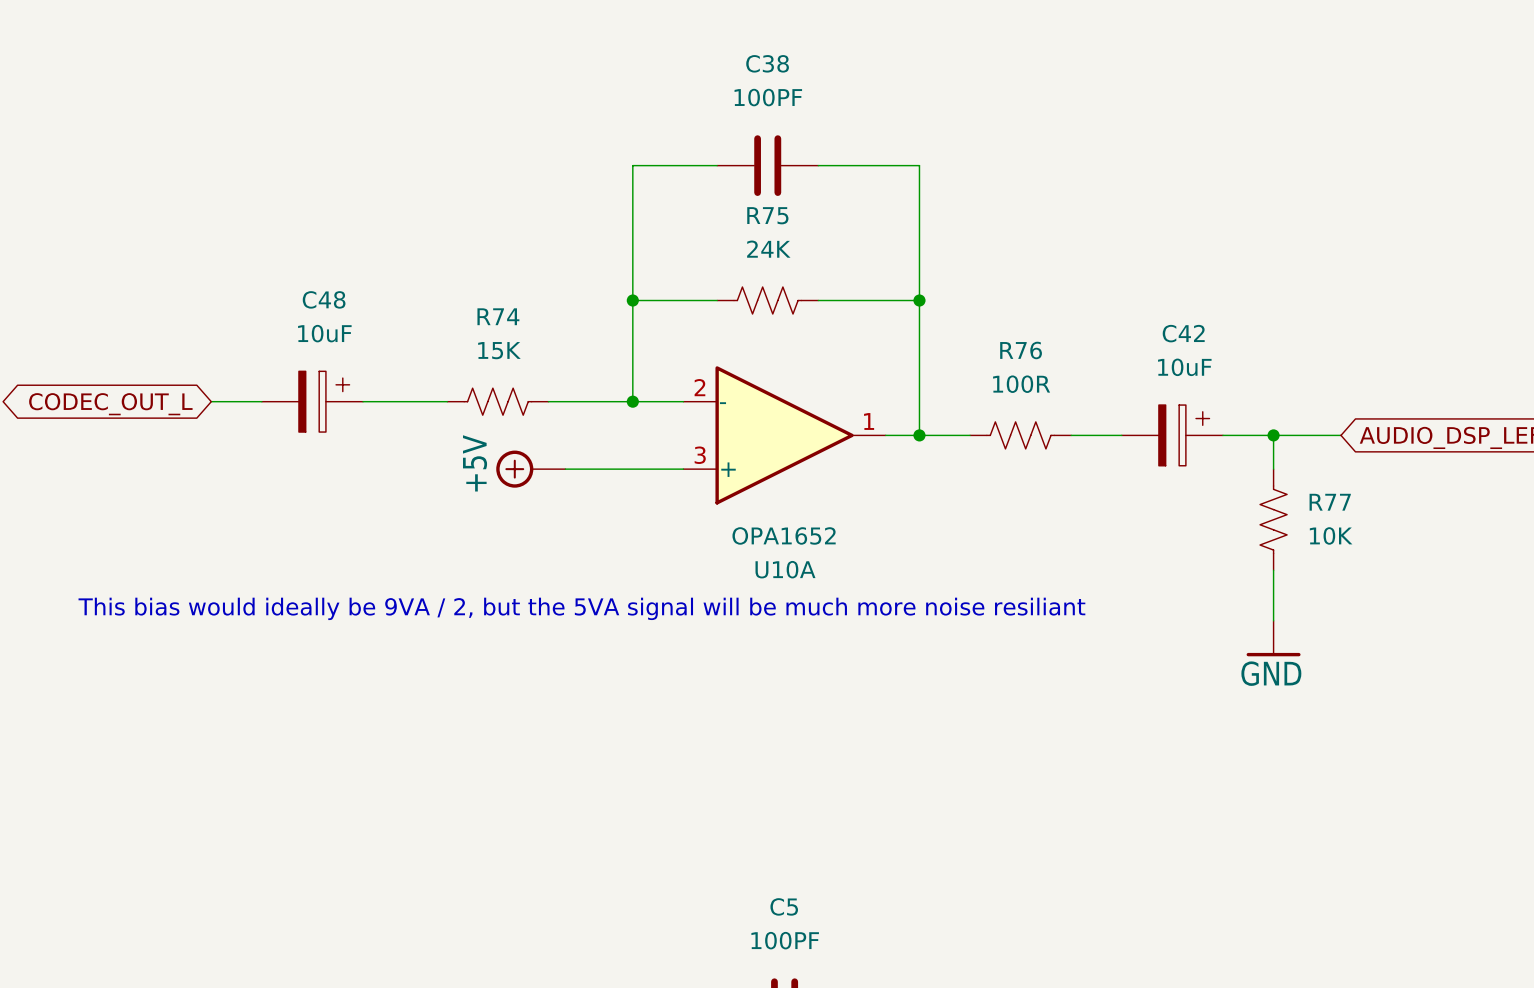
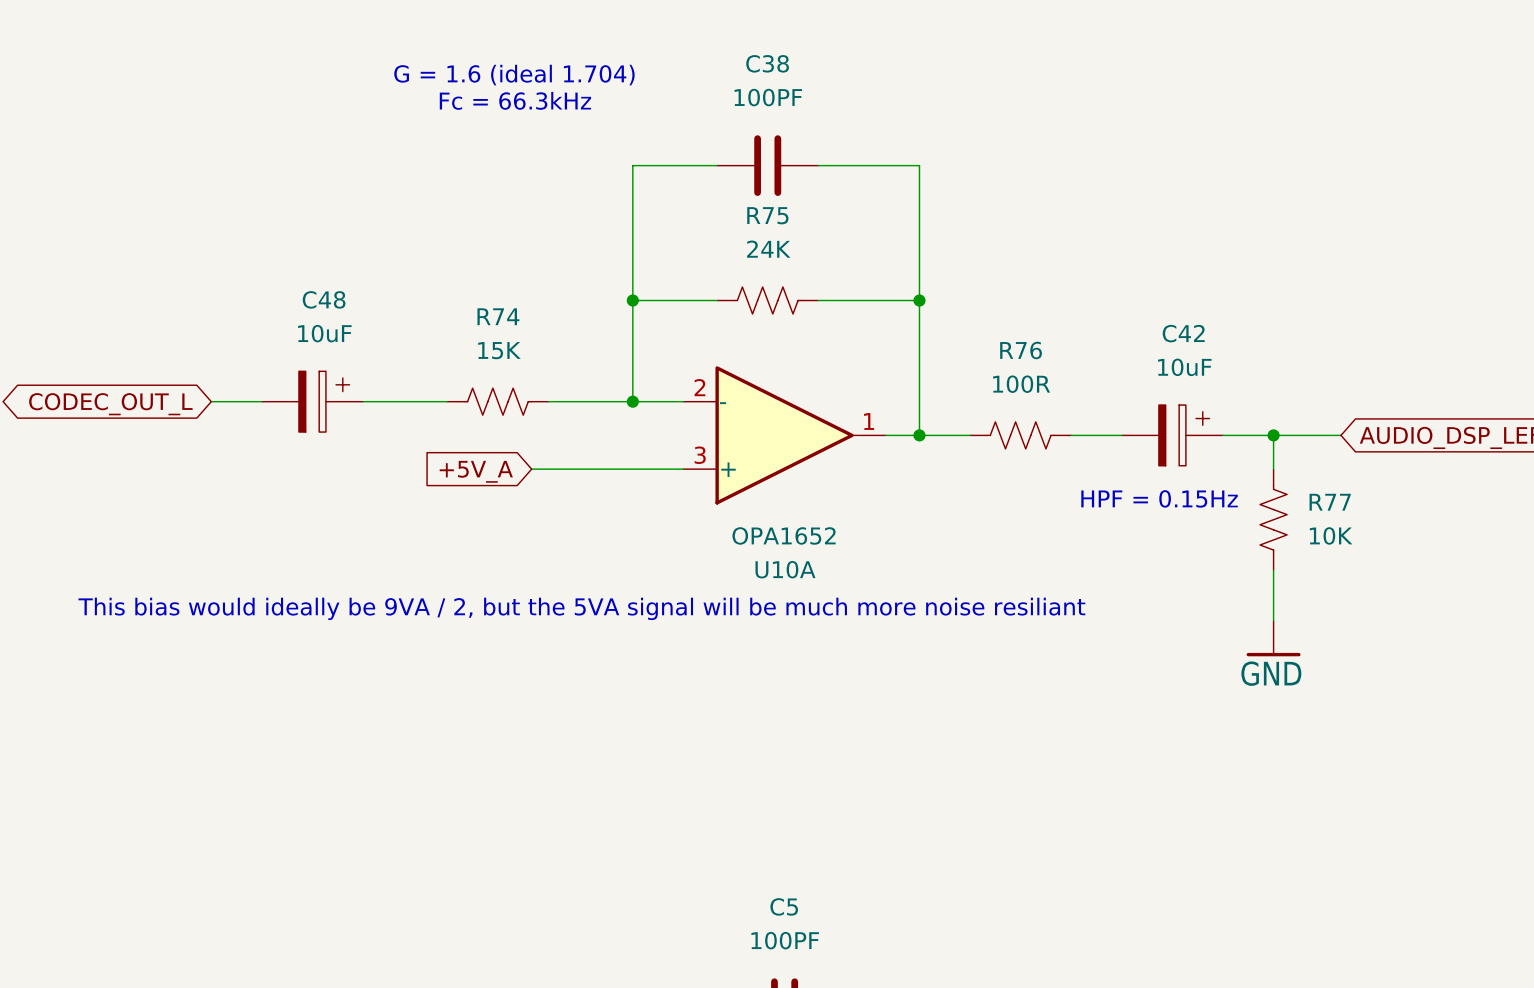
text: none -> G = 1.6 (ideal 1.704) (514, 75)
text: none -> Fc = 66.3kHz (515, 100)
power symbol: +5V (530, 469) -> none
global label: none -> +5V_A (476, 471)
text: none -> HPF = 0.15Hz (1159, 498)

